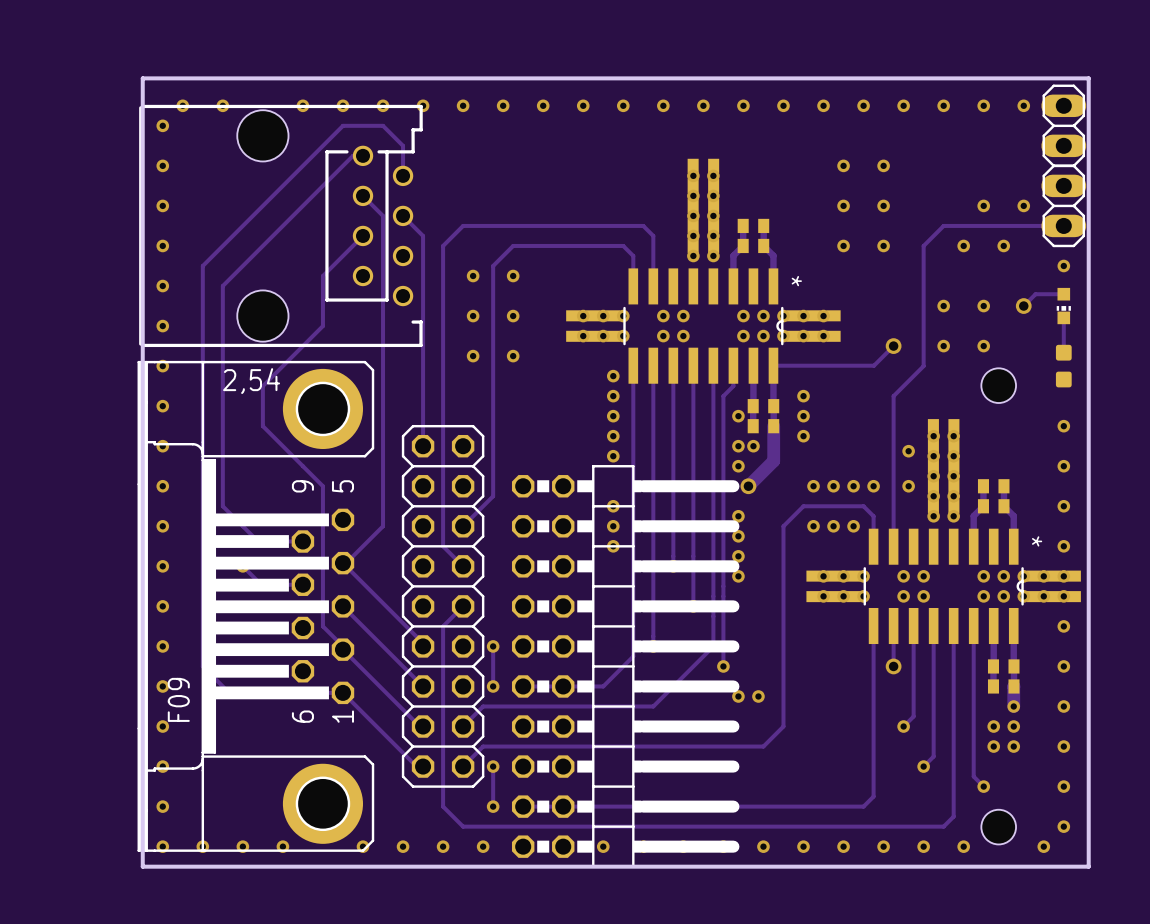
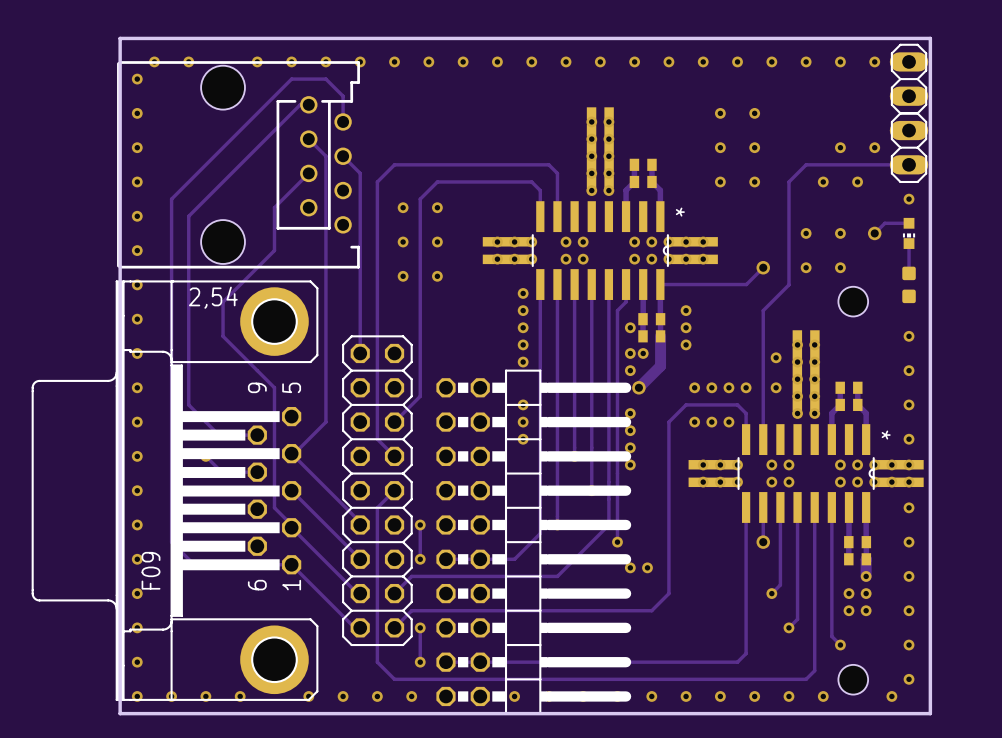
part: none -> (175, 490)
part: (255, 606) -> none

